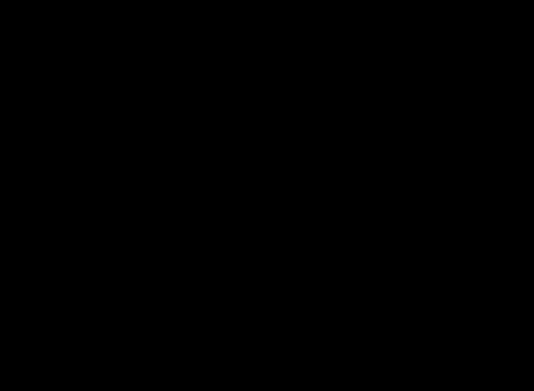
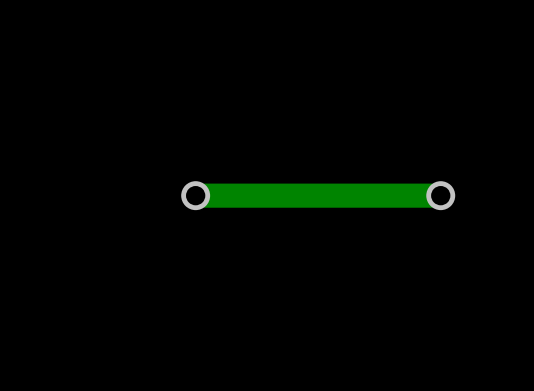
via: none -> (195, 195)
track: none -> (440, 195) (195, 195)
via: none -> (440, 195)

